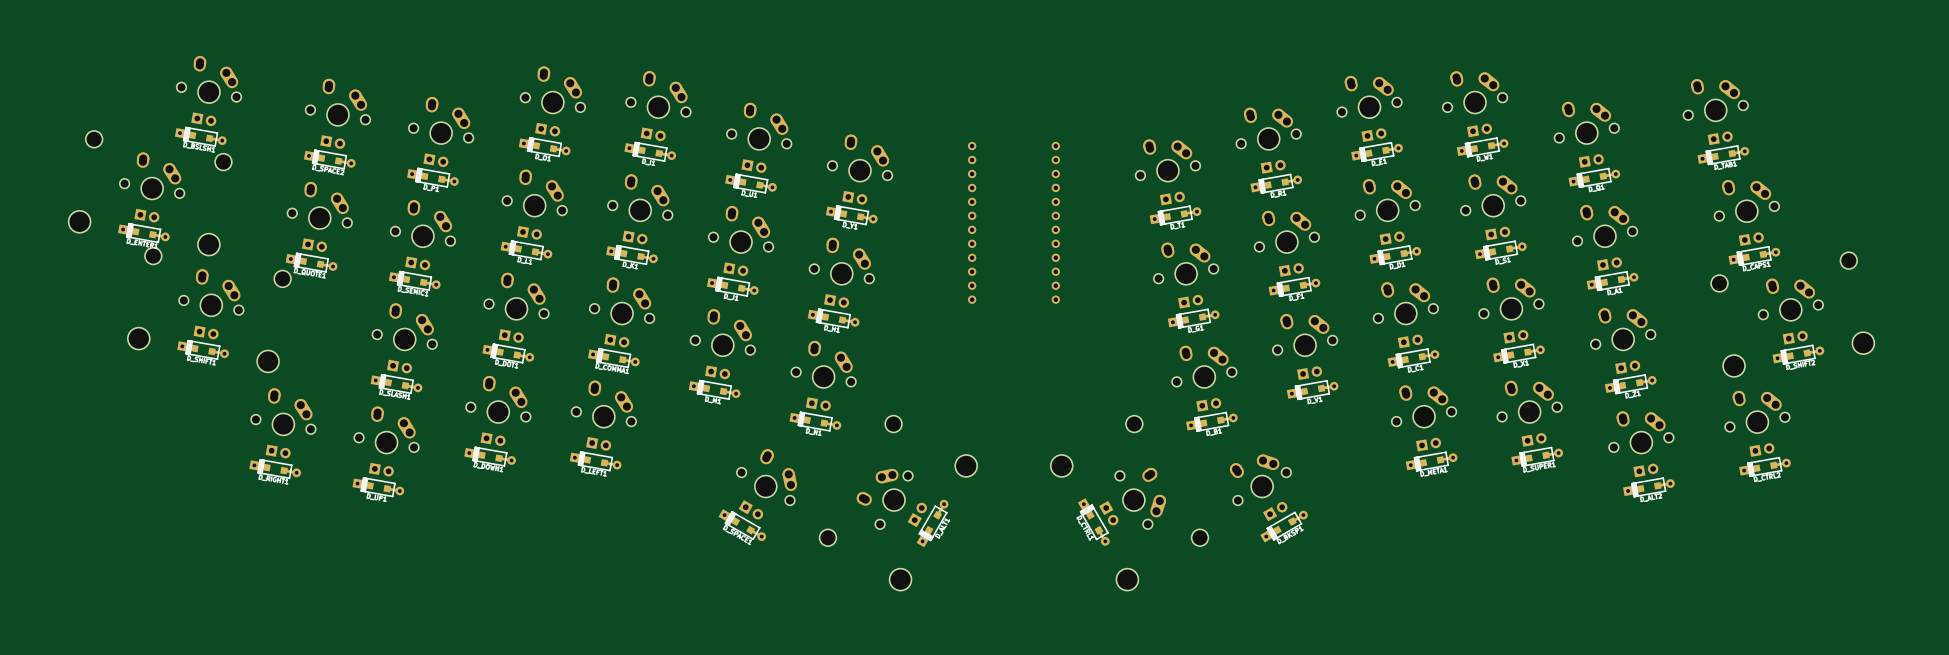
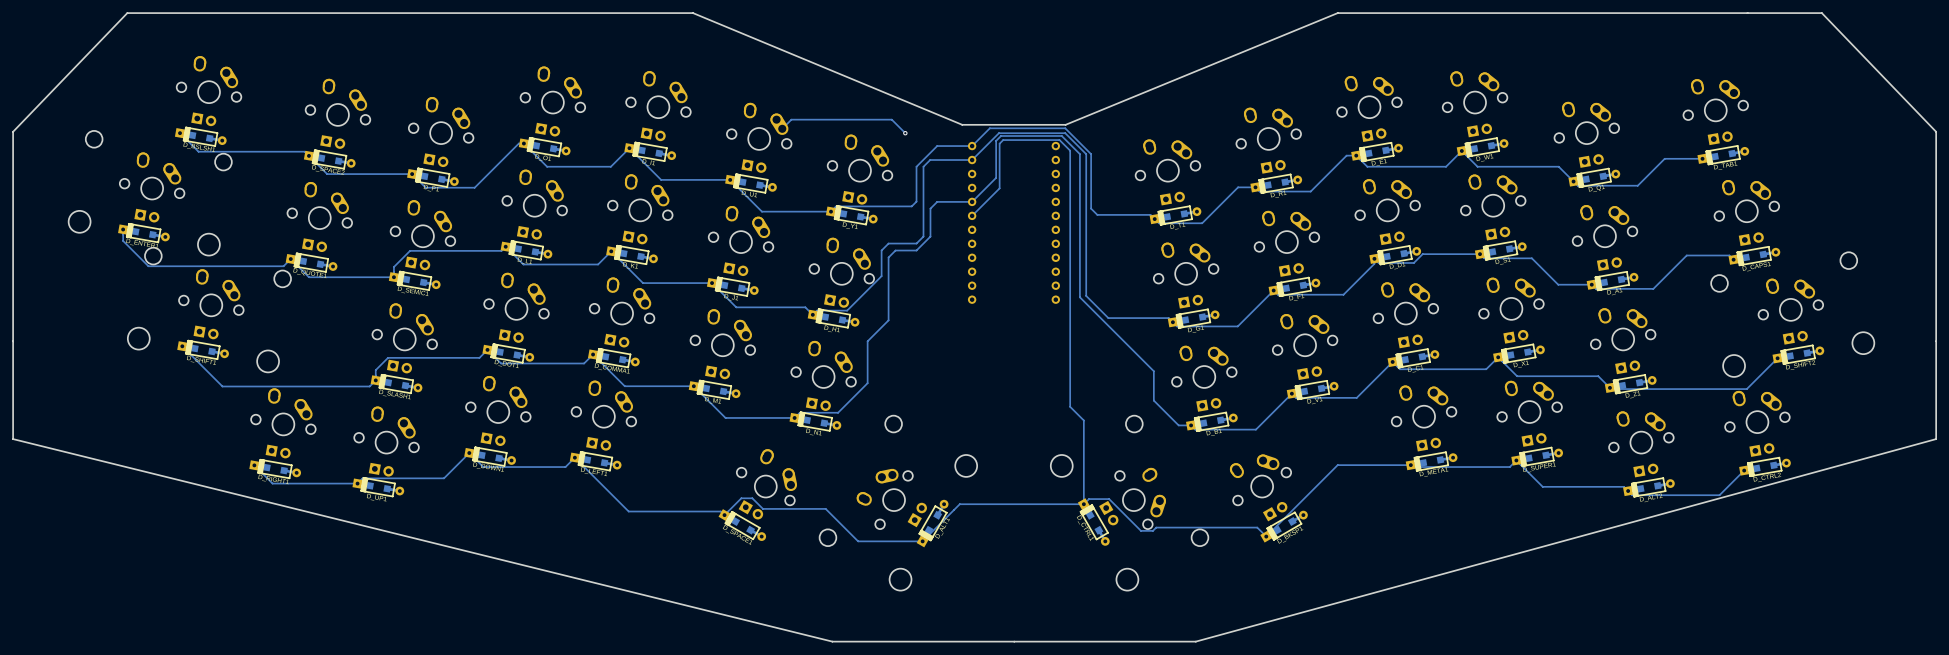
board edge: none -> (1821, 13) (1337, 13) (1065, 124) (962, 124) (693, 13) (127, 13) (13, 131) (13, 439) (832, 641) (1195, 641) (1936, 439) (1936, 131) (1821, 13)
track: none -> (782, 128) (791, 119) (891, 119) (905, 133)
track: none -> (180, 133) (198, 151) (304, 151) (327, 174) (412, 174) (425, 187) (474, 187) (518, 143) (523, 143) (547, 166) (610, 166) (629, 148) (661, 179) (730, 179) (761, 211) (831, 211) (836, 206) (911, 206) (916, 201) (916, 166) (937, 146) (972, 146) (989, 128) (1065, 128) (1091, 154) (1091, 208) (1097, 214) (1150, 214) (1158, 223) (1202, 223) (1238, 187) (1255, 187) (1259, 191) (1310, 191) (1346, 155) (1356, 155) (1367, 166) (1446, 166) (1461, 150) (1477, 166) (1558, 166) (1577, 185) (1637, 185) (1664, 158) (1702, 158)
via: none -> (905, 133)
track: none -> (972, 215) (999, 188) (999, 143) (1003, 140) (1059, 140) (1070, 150) (1070, 406) (1083, 420) (1083, 504)
track: none -> (123, 229) (123, 240) (148, 266) (283, 266) (290, 259) (308, 277) (393, 277) (393, 266) (410, 250) (501, 250) (505, 246) (523, 264) (598, 264) (611, 251) (642, 283) (712, 283) (736, 307) (805, 307) (812, 314) (816, 310) (847, 310) (881, 276) (881, 250) (888, 243) (916, 243) (923, 236) (923, 166) (930, 160) (972, 160) (998, 133) (1065, 133) (1086, 154) (1086, 295) (1108, 318) (1168, 318) (1177, 326) (1237, 326) (1273, 290) (1277, 294) (1343, 294) (1374, 263) (1374, 258) (1378, 262) (1413, 262) (1422, 254) (1480, 254) (1484, 258) (1531, 258) (1558, 284) (1591, 284) (1595, 288) (1653, 288) (1686, 255) (1729, 255) (1733, 259)
track: none -> (182, 346) (222, 386) (369, 386) (375, 380) (375, 370) (388, 357) (479, 357) (487, 349) (501, 363) (584, 363) (593, 354) (624, 386) (693, 386) (725, 417) (794, 417) (799, 412) (838, 412) (867, 383) (867, 341) (888, 320) (888, 257) (895, 250) (916, 250) (930, 236) (930, 208) (937, 201) (972, 201) (996, 177) (996, 140) (1001, 135) (1061, 135) (1079, 154) (1079, 297) (1153, 371) (1153, 400) (1178, 425) (1191, 425) (1195, 429) (1255, 429) (1291, 393) (1296, 397) (1356, 397) (1392, 361) (1399, 369) (1486, 369) (1498, 357) (1517, 376) (1598, 376) (1609, 387) (1616, 389) (1746, 389) (1777, 358)
track: none -> (254, 465) (272, 483) (357, 483) (362, 478) (444, 478) (469, 453) (483, 467) (565, 467) (574, 457) (628, 511) (720, 511) (724, 515) (741, 498) (752, 498) (762, 508) (825, 508) (858, 541) (922, 541) (959, 504) (1083, 504)
track: none -> (1744, 470) (1719, 495) (1632, 495) (1623, 486) (1542, 486) (1516, 460) (1509, 467) (1337, 465) (1266, 536) (1257, 527) (1156, 527) (1152, 530) (1141, 530) (1109, 499) (1089, 499) (1083, 504)

